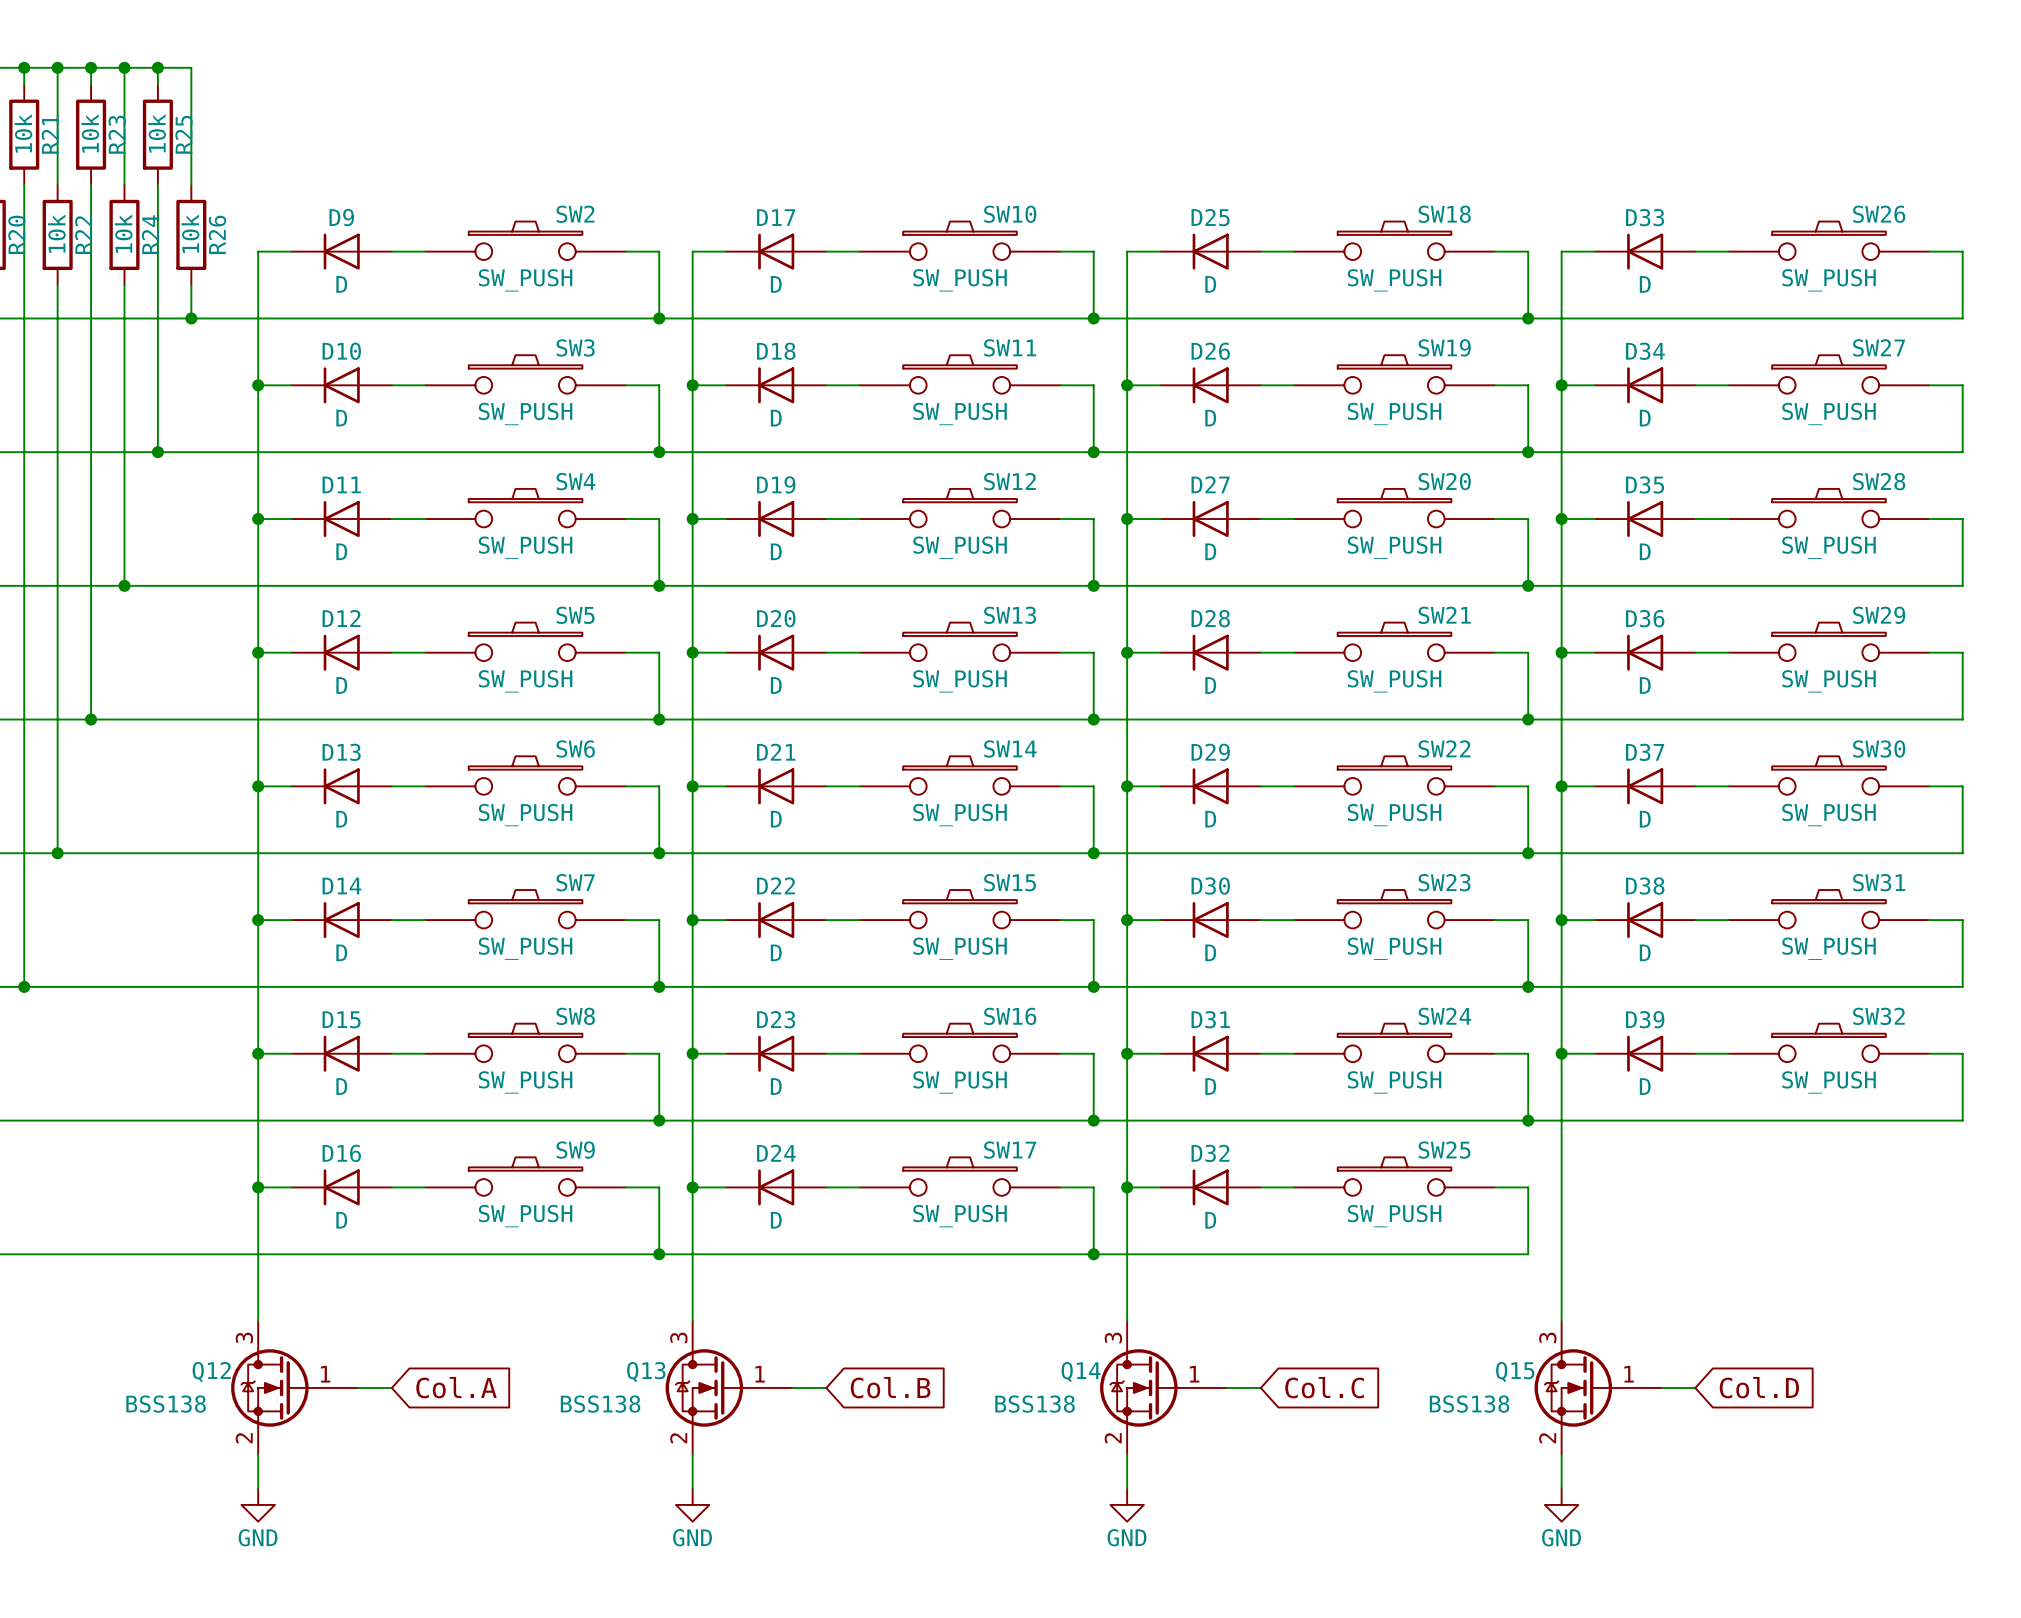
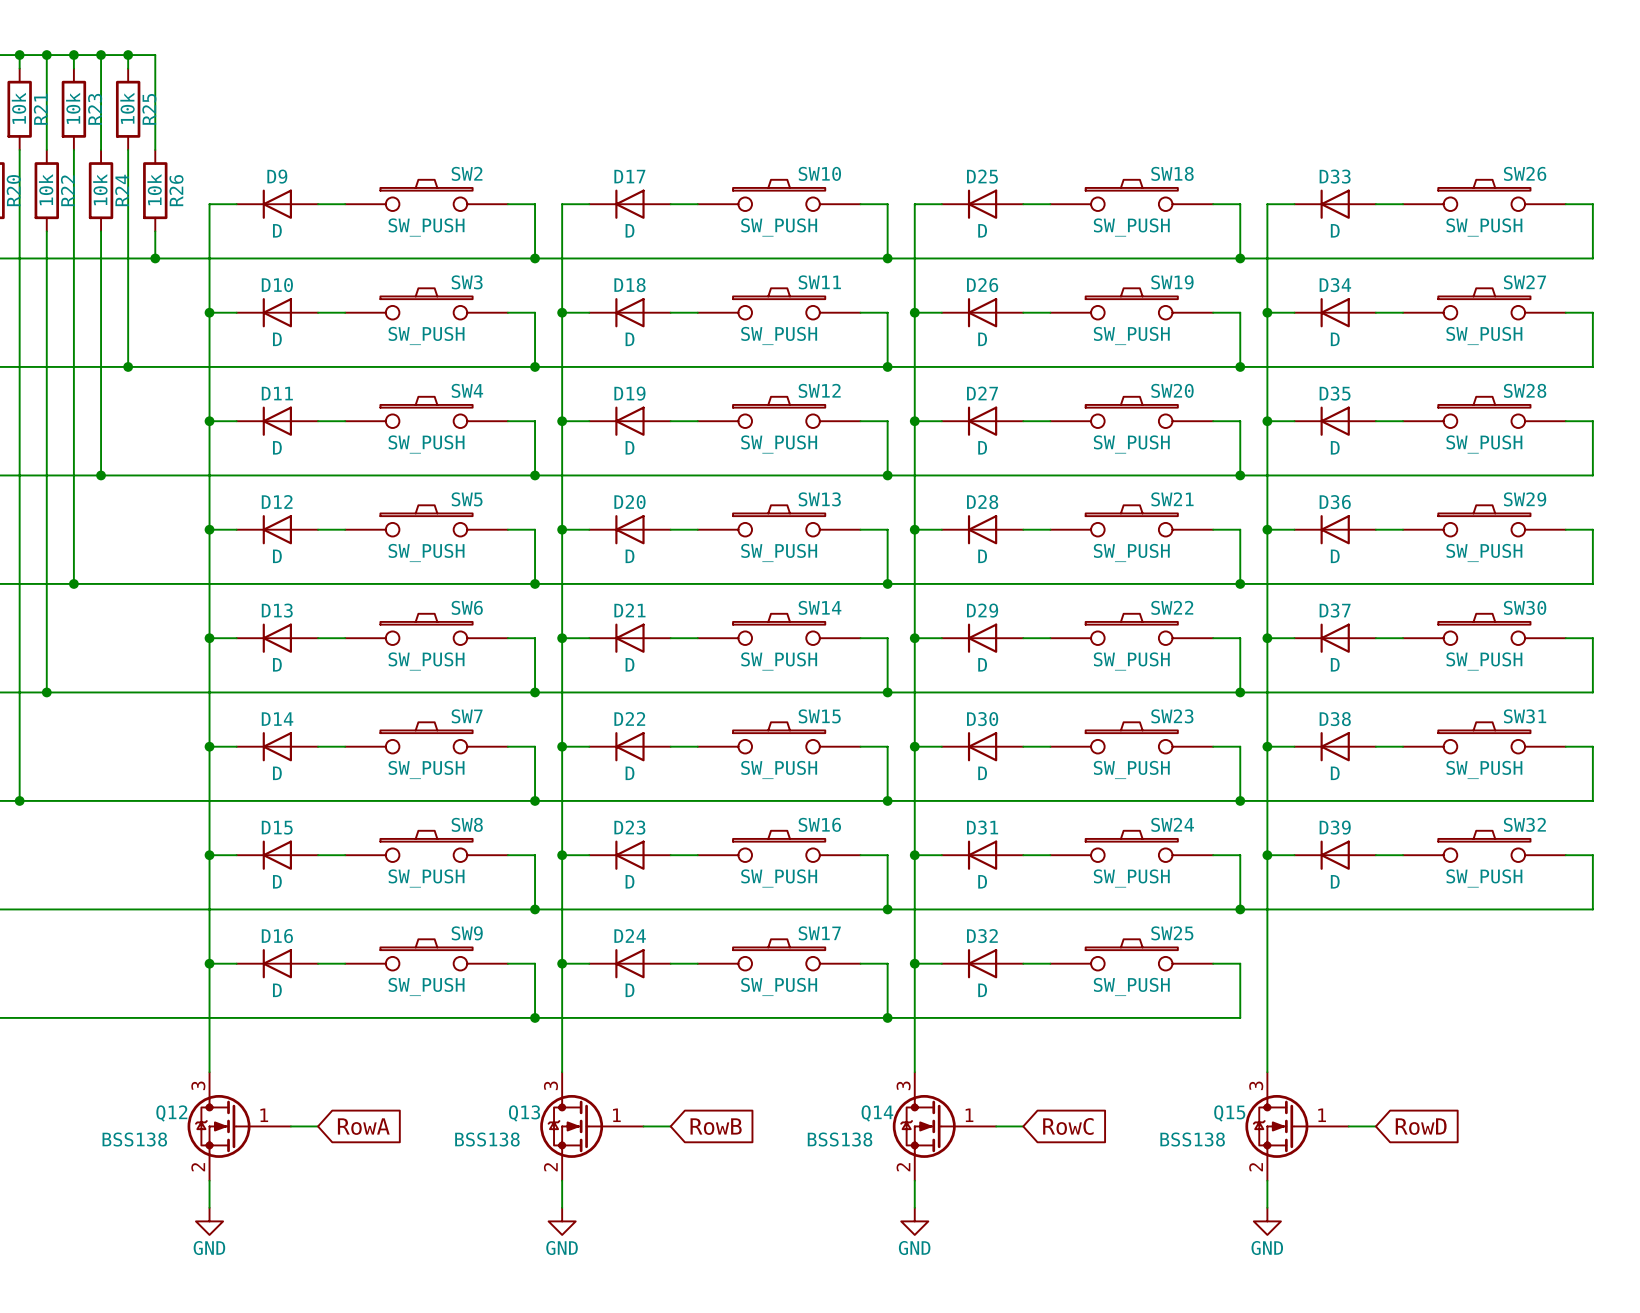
global label: Col.A (456, 1387) -> RowA (363, 1126)
global label: Col.B (890, 1387) -> RowB (716, 1126)
global label: Col.C (1324, 1387) -> RowC (1068, 1126)
global label: Col.D (1759, 1387) -> RowD (1421, 1126)

